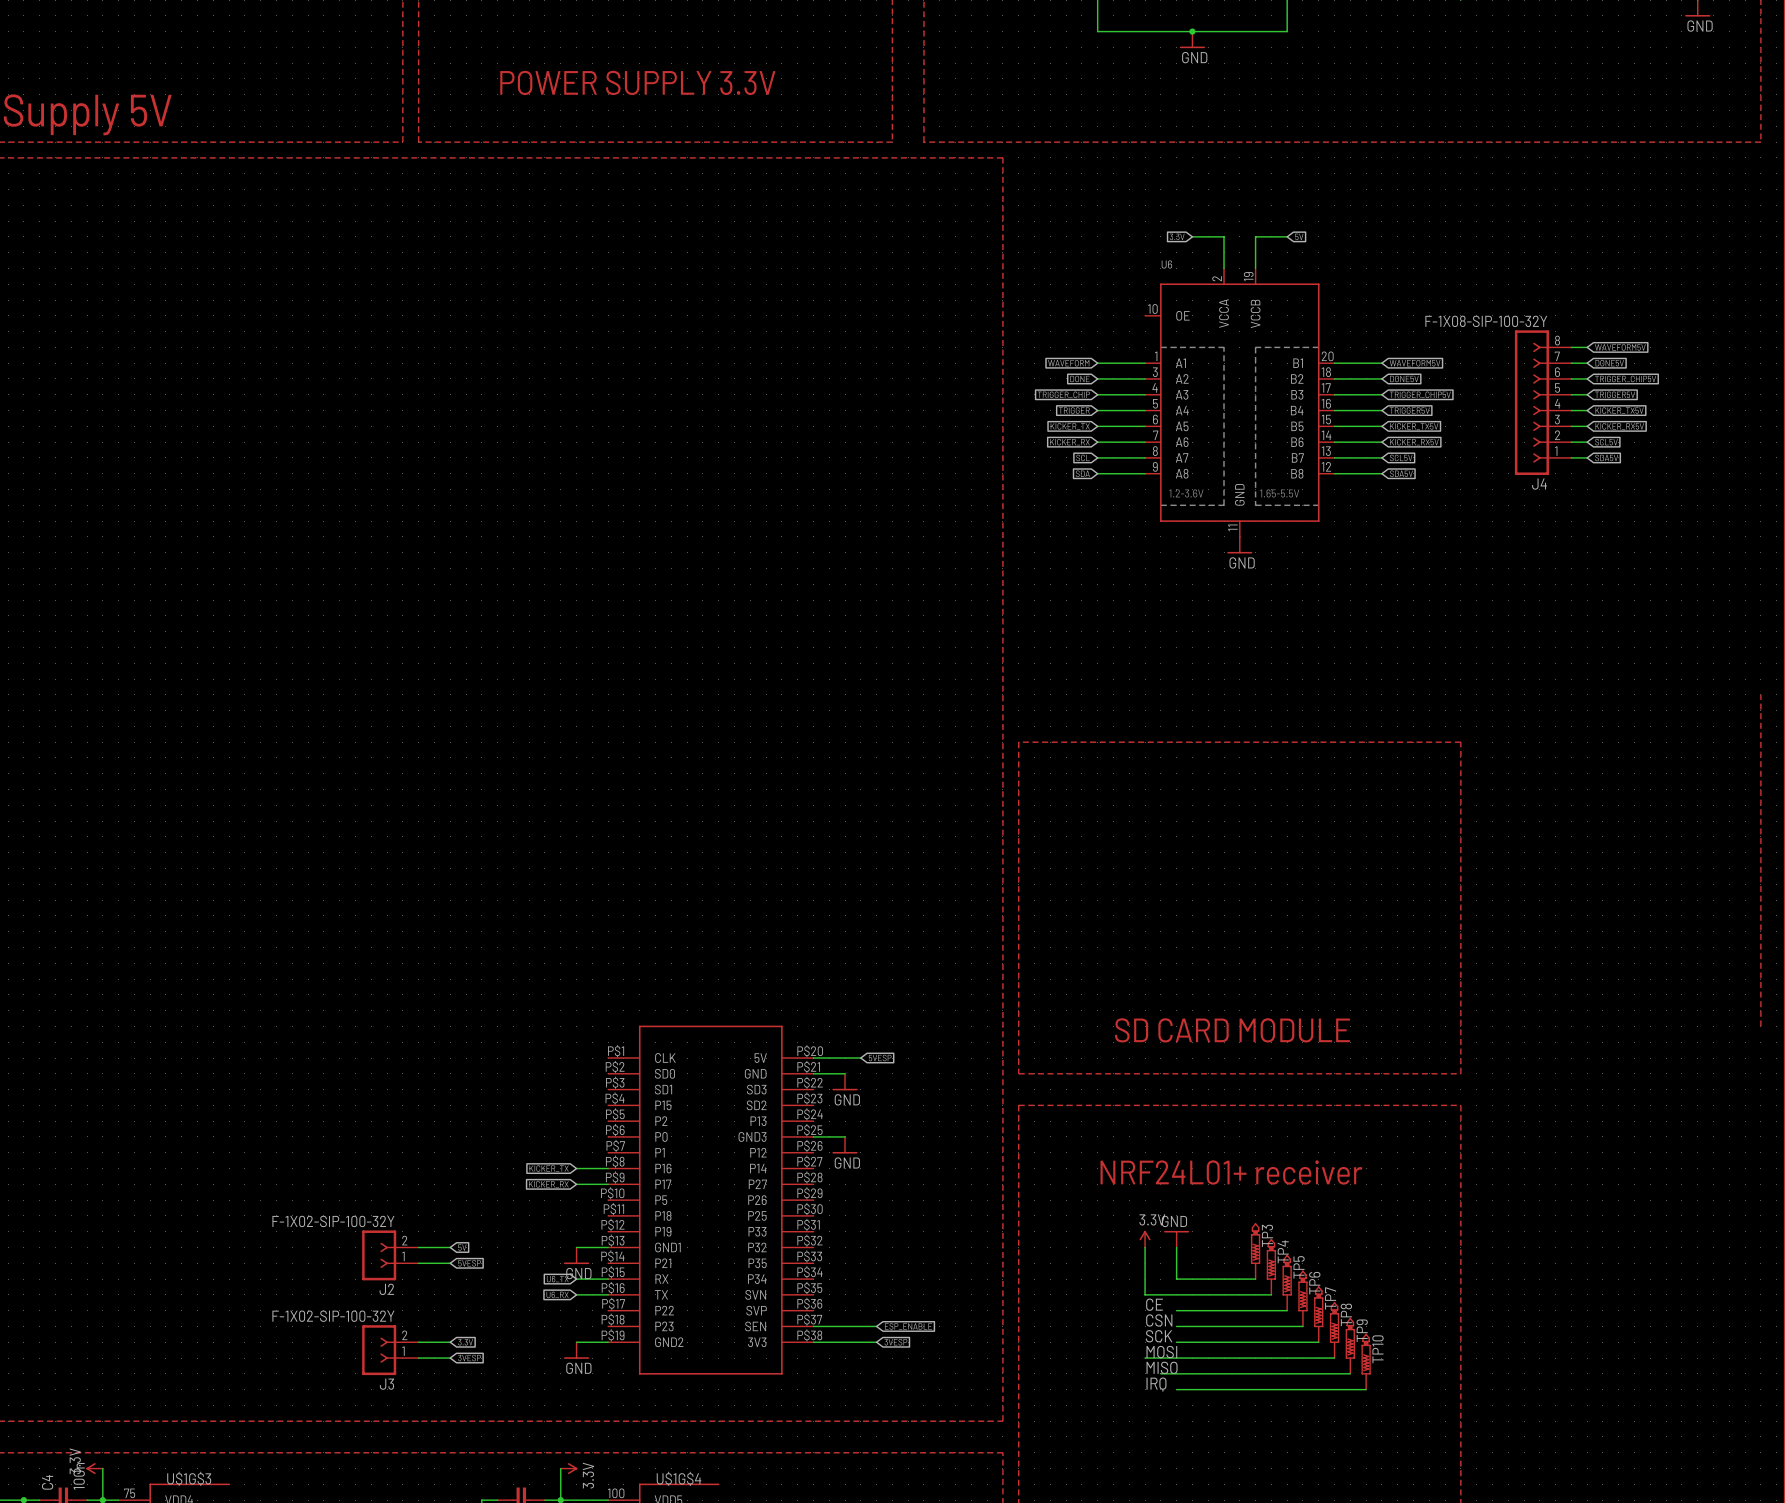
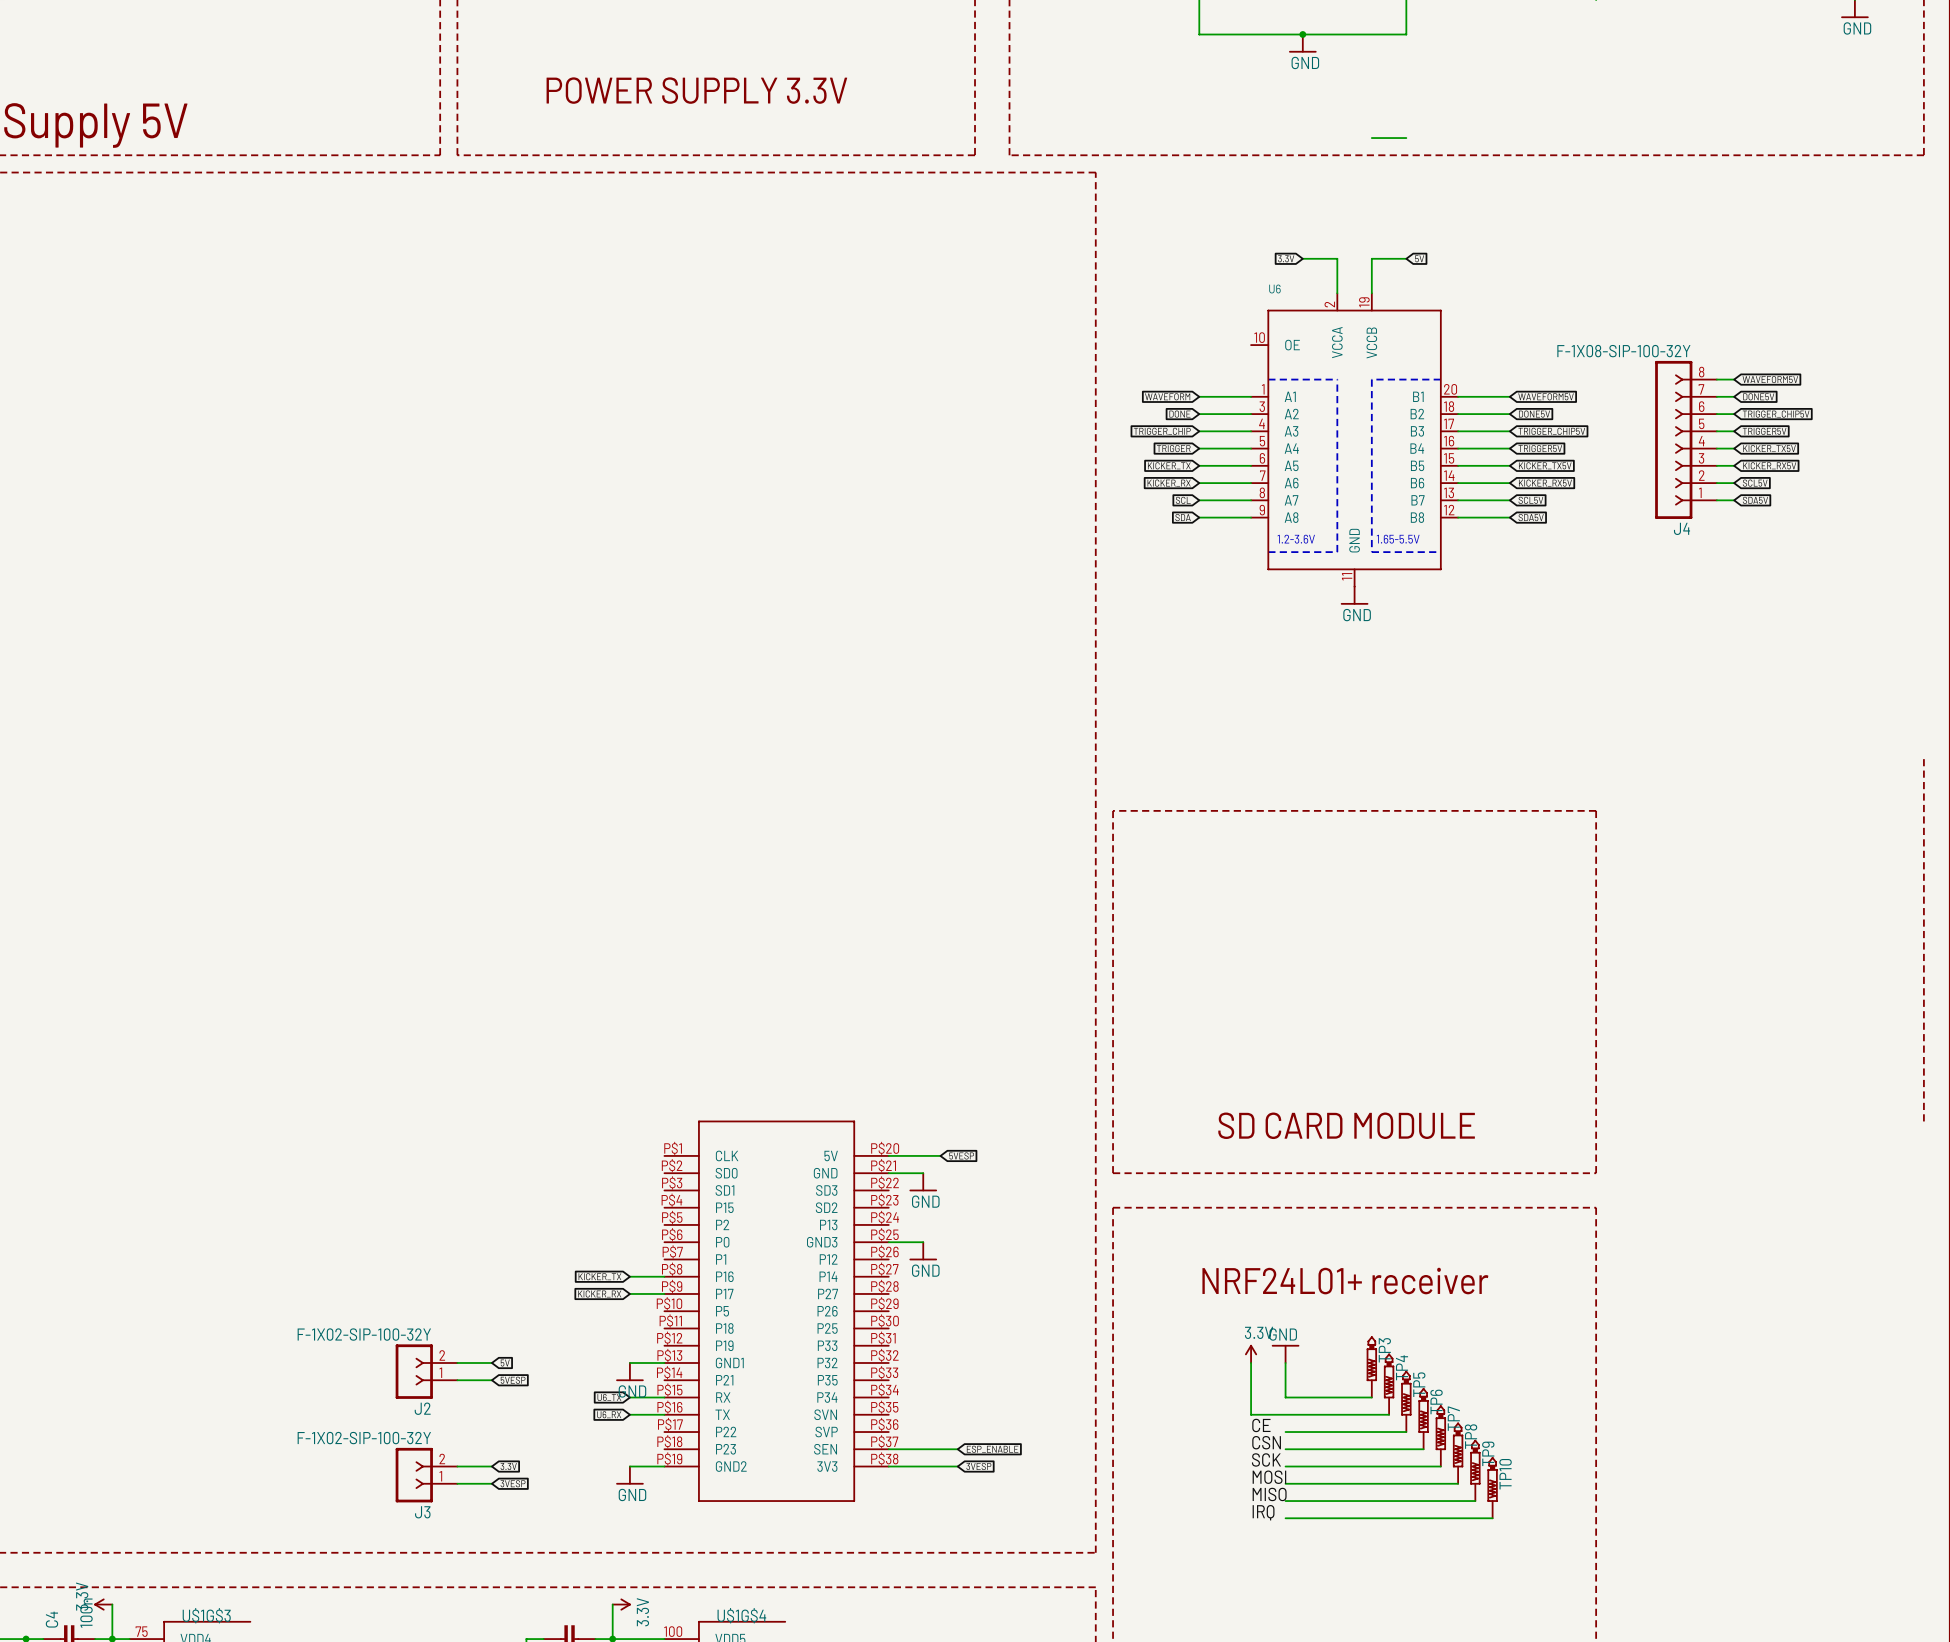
wire: none -> (1371, 138) (1406, 138)
wire: (1145, 1358) (1176, 1358) -> none
wire: (1160, 1373) (1176, 1373) -> none

